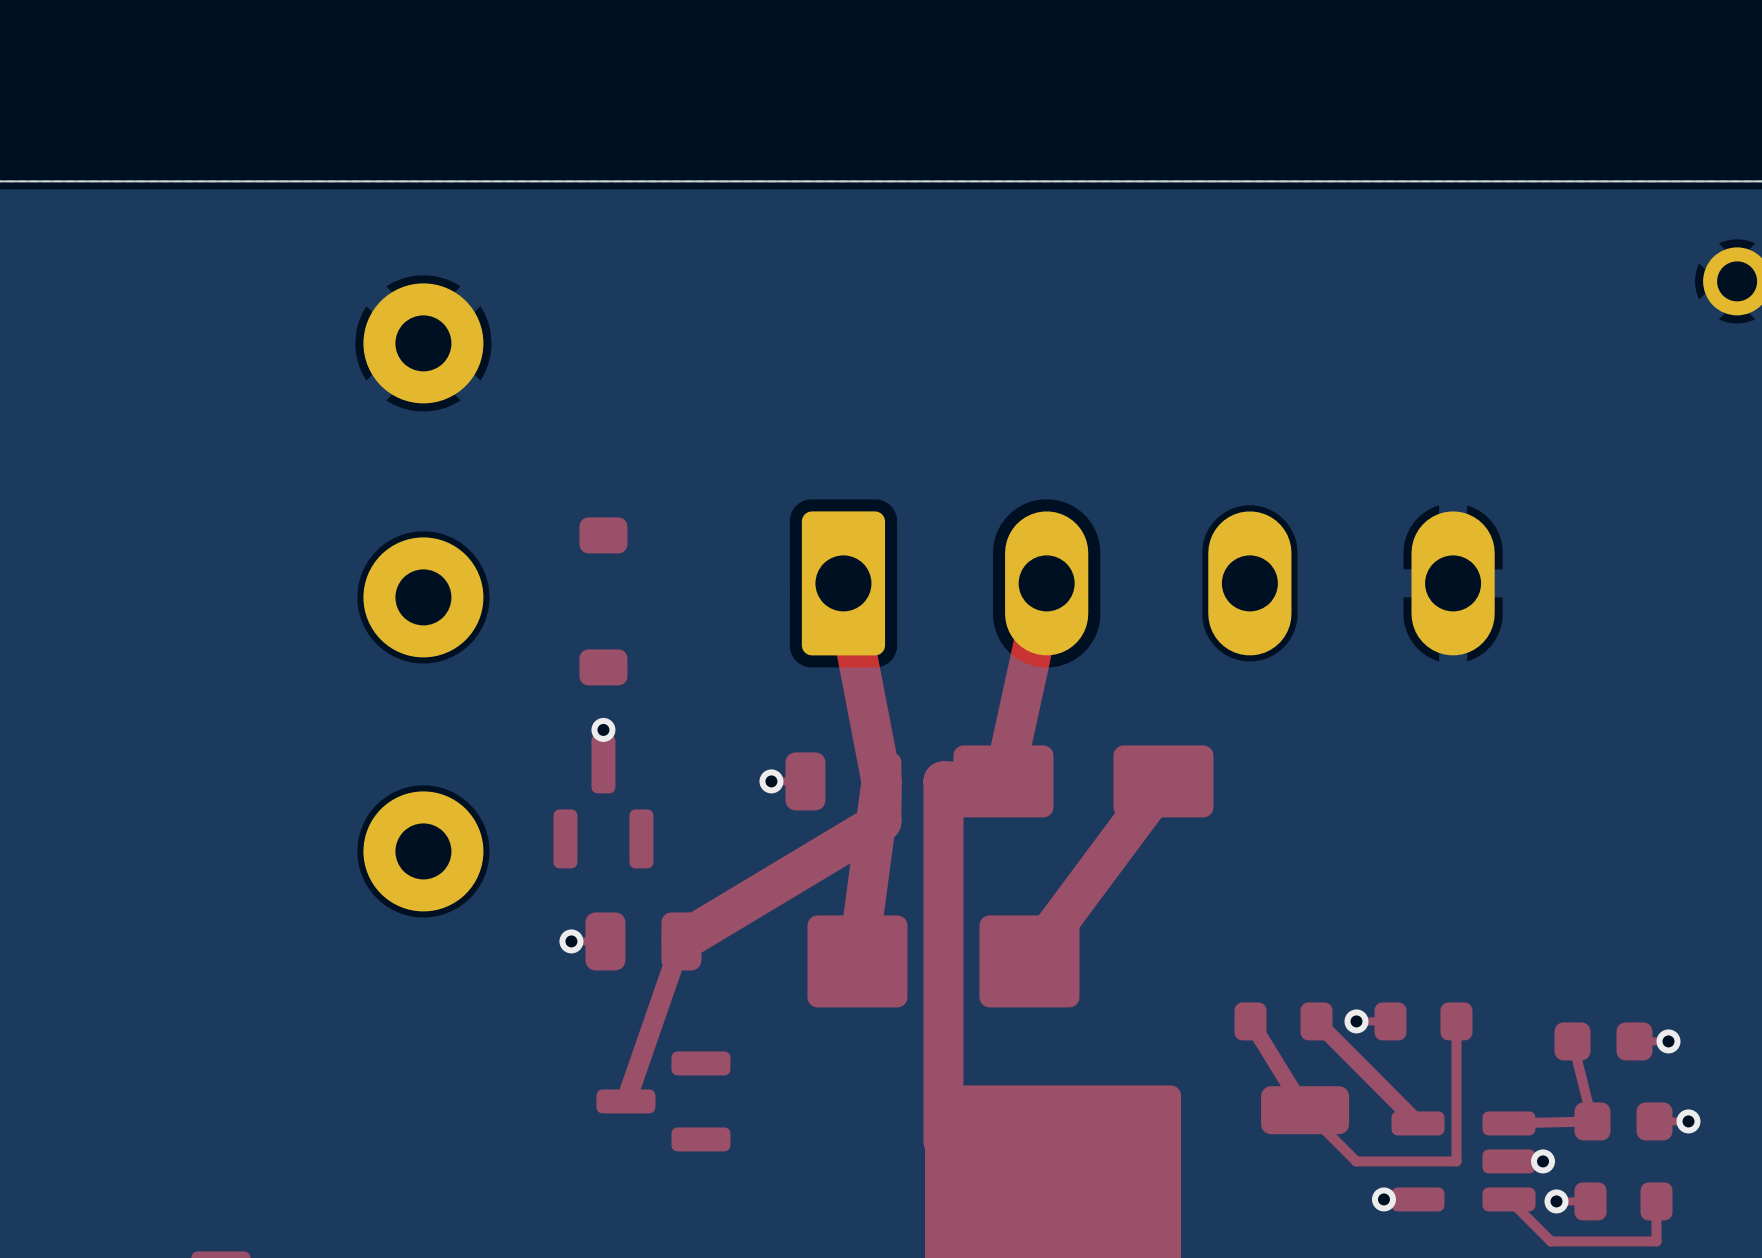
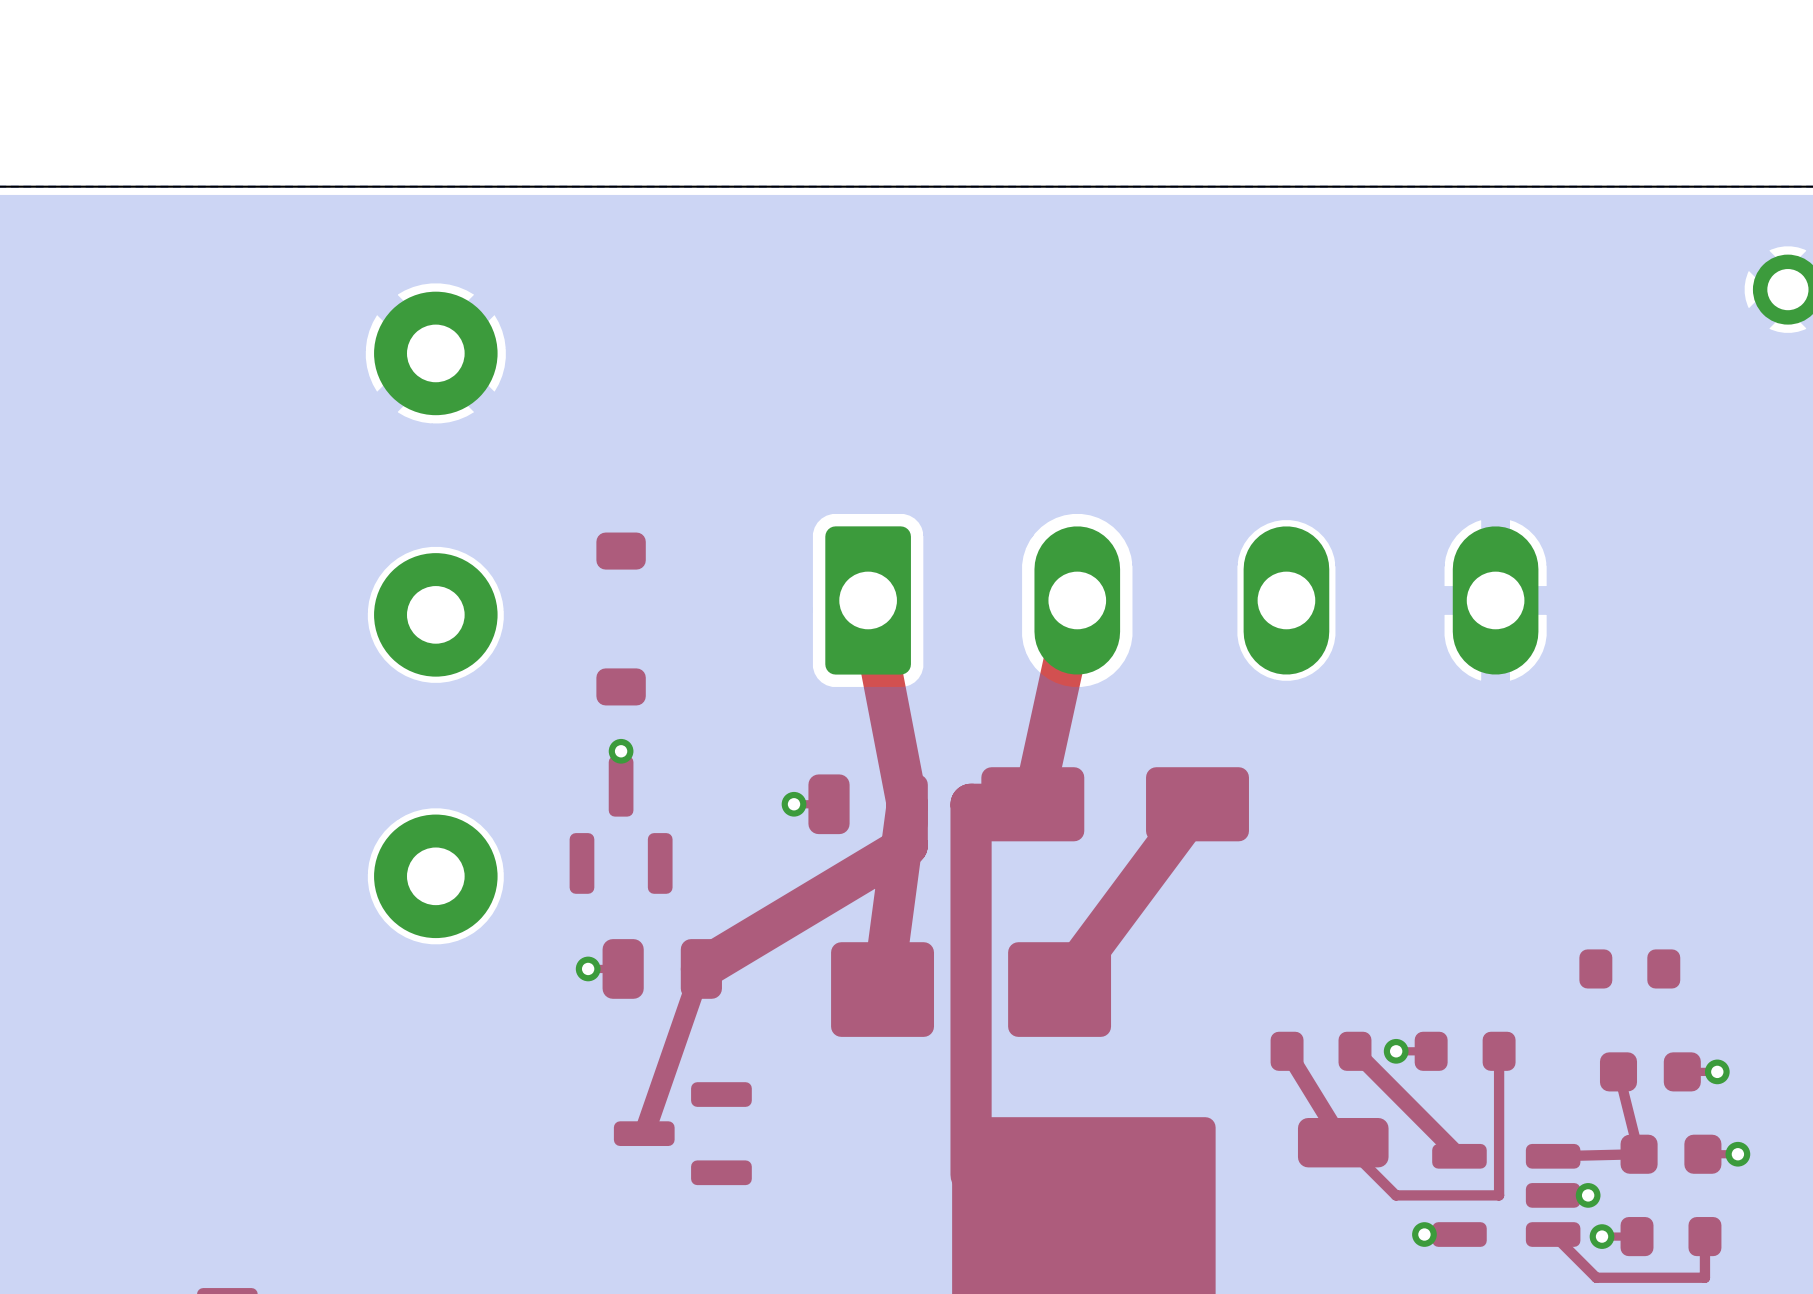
part: none -> (1629, 968)

